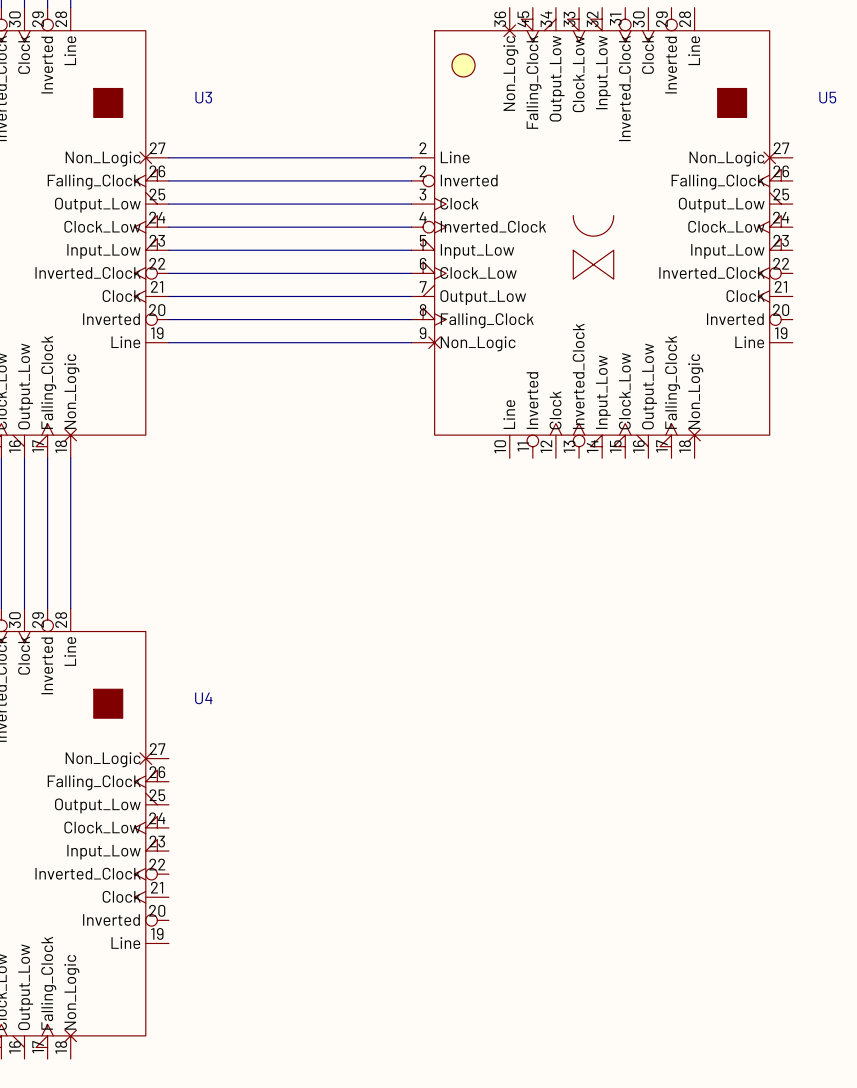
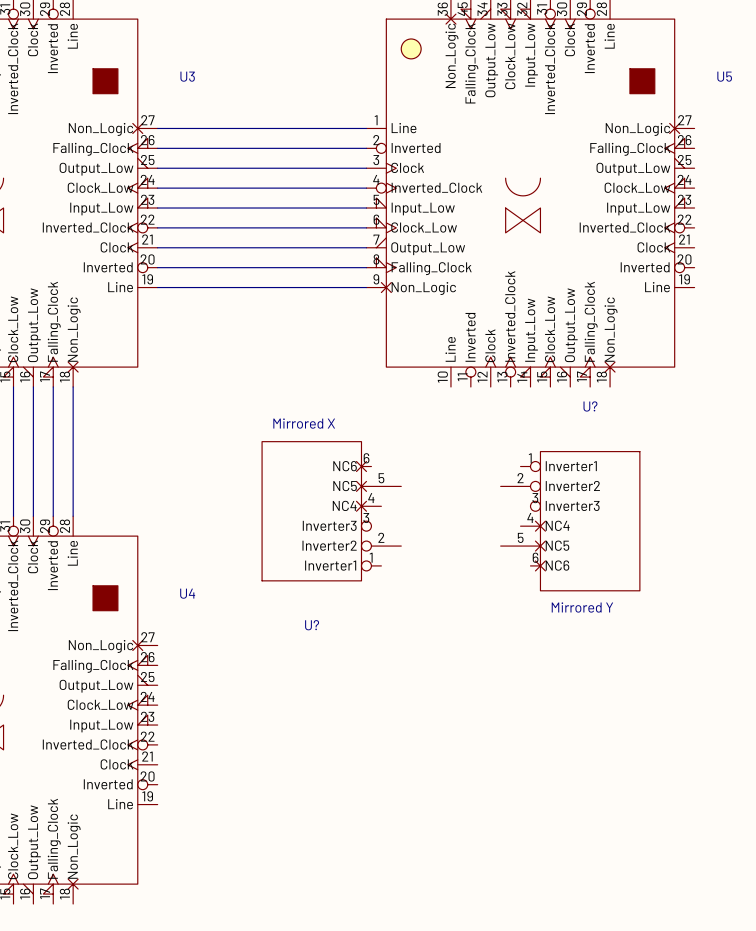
U5 pin number: 2 (423, 148) -> 1 (376, 120)
text: none -> Mirrored X (304, 423)
U?: none -> (331, 511)
U?: none -> (570, 521)
text: none -> Mirrored Y (582, 607)

